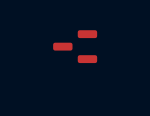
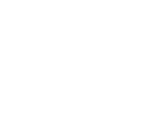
part: (75, 46) -> none

